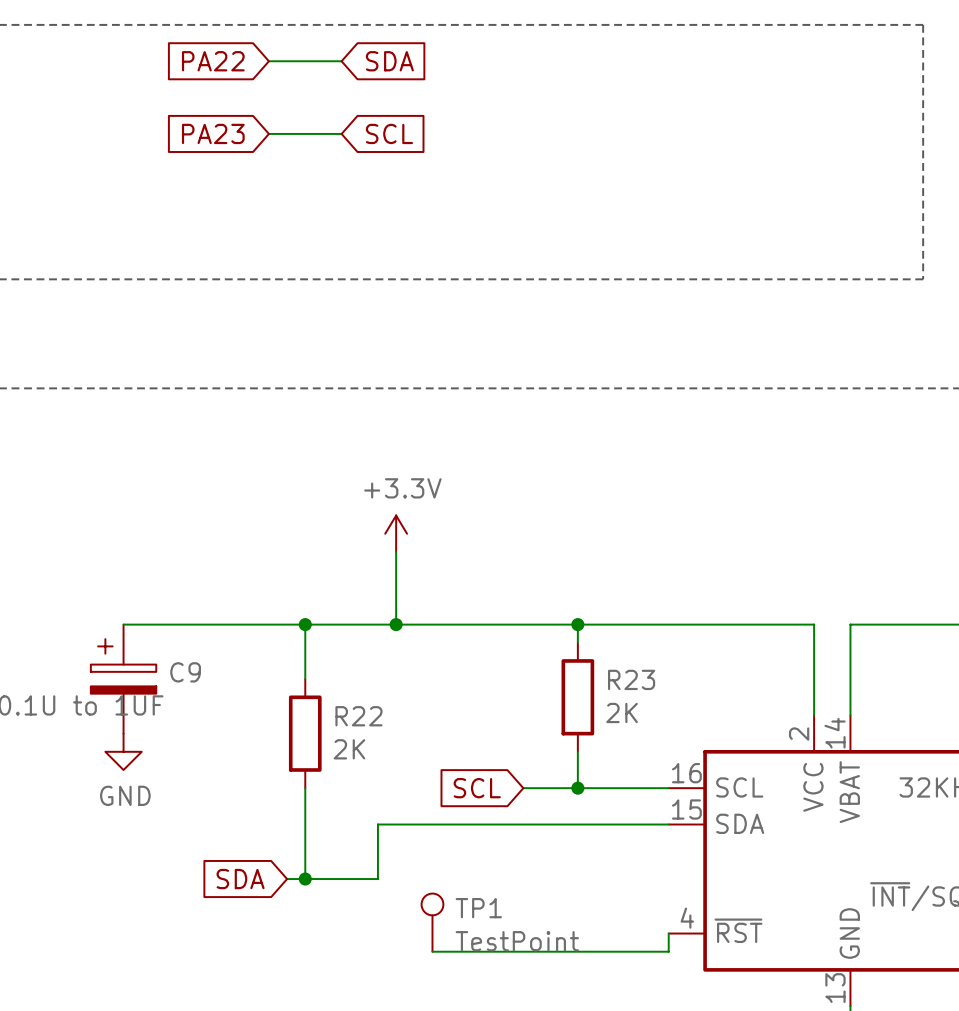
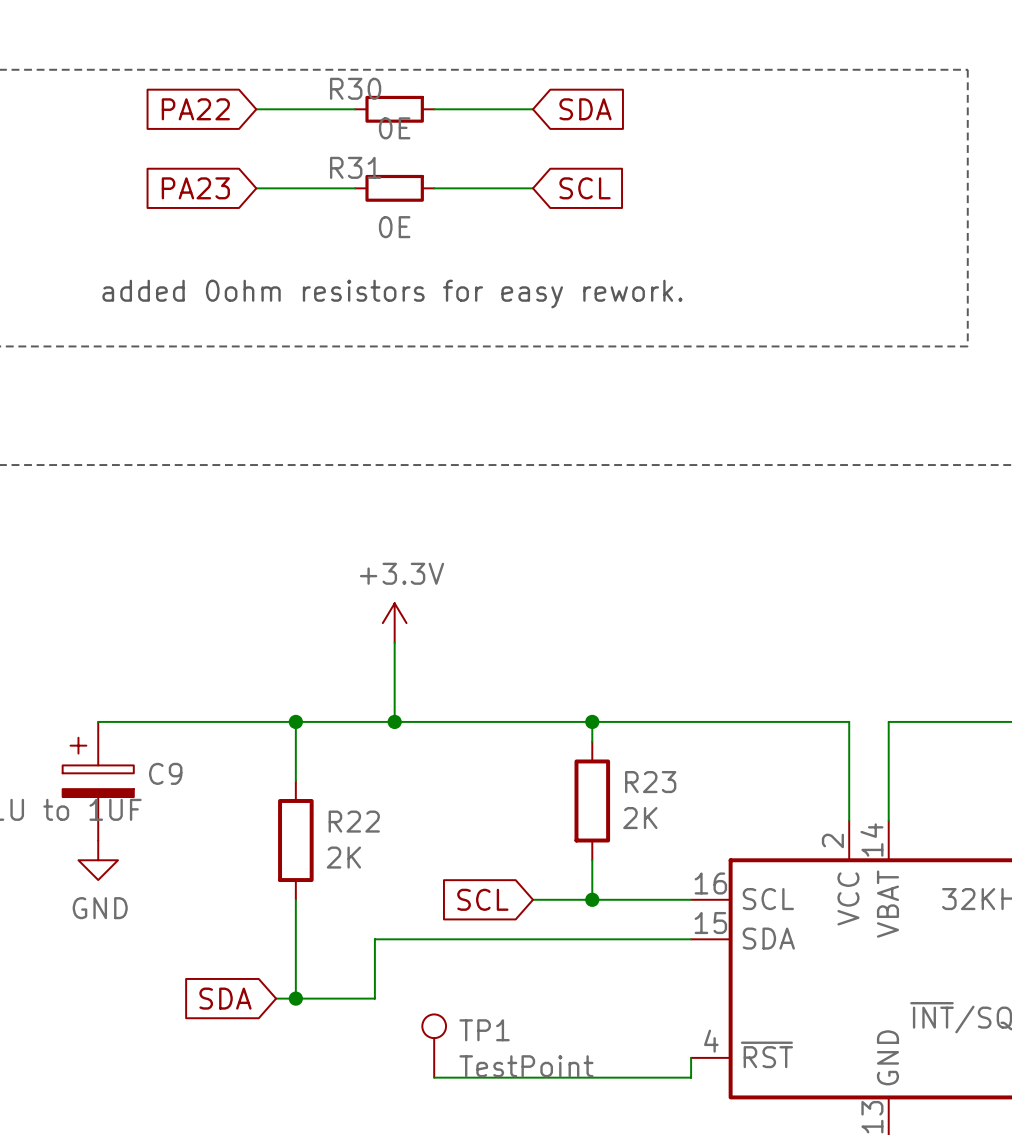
wire: none -> (335, 109) (355, 109)
global label position: SDA (389, 61) -> SDA (585, 109)
R30: none -> 0E (394, 109)
wire: none -> (434, 109) (533, 109)
wire: none -> (335, 188) (355, 188)
global label position: SCL (389, 133) -> SCL (585, 188)
R31: none -> 0E (394, 188)
wire: none -> (434, 188) (533, 188)
text: none -> added 0ohm resistors for easy rework. (392, 294)

